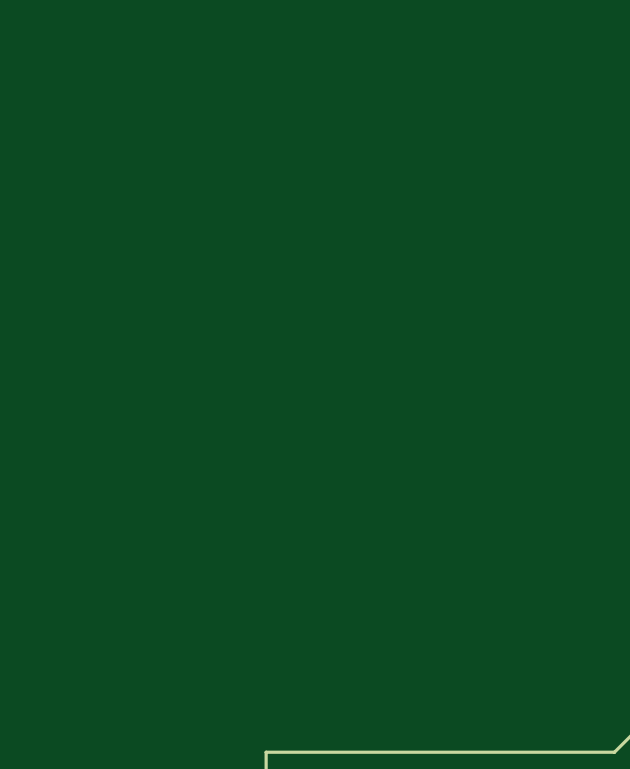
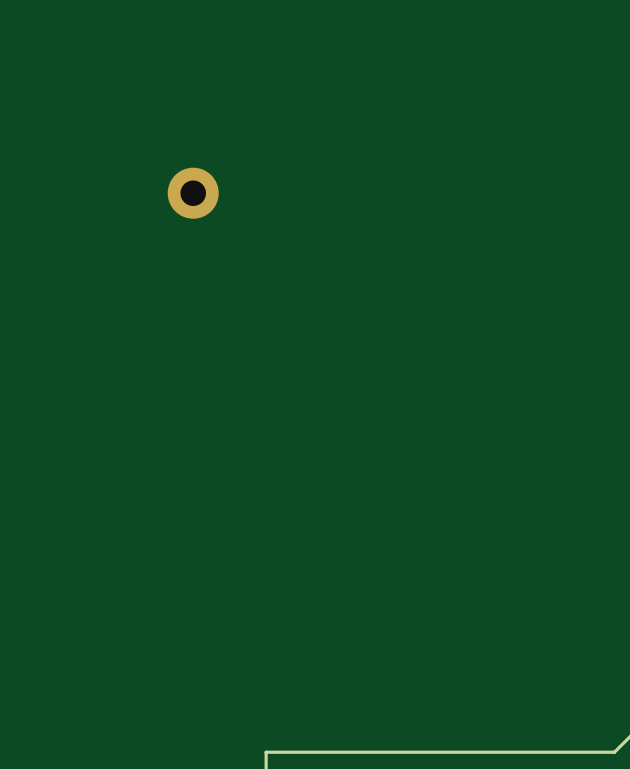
via: none -> (193, 193)

